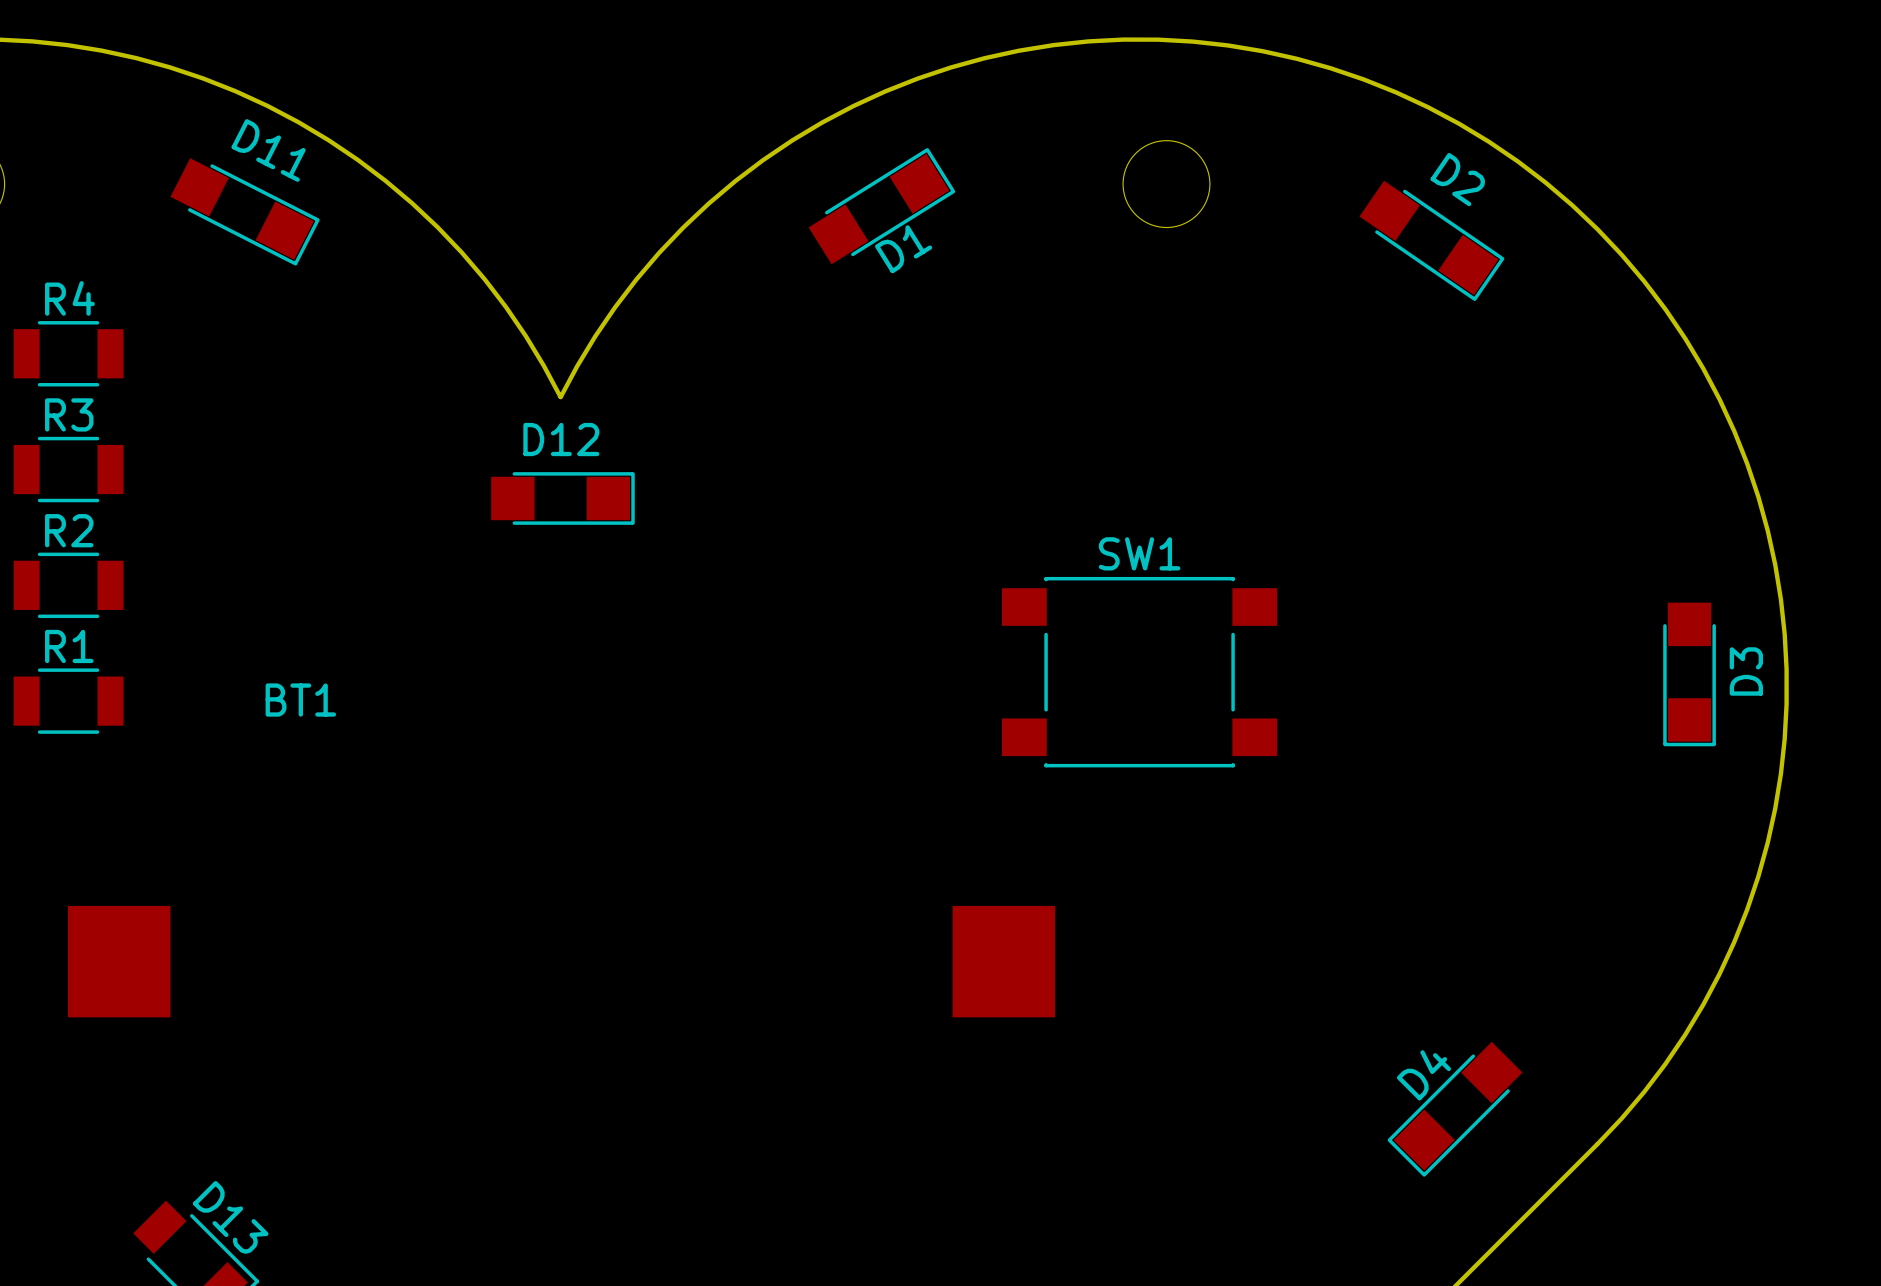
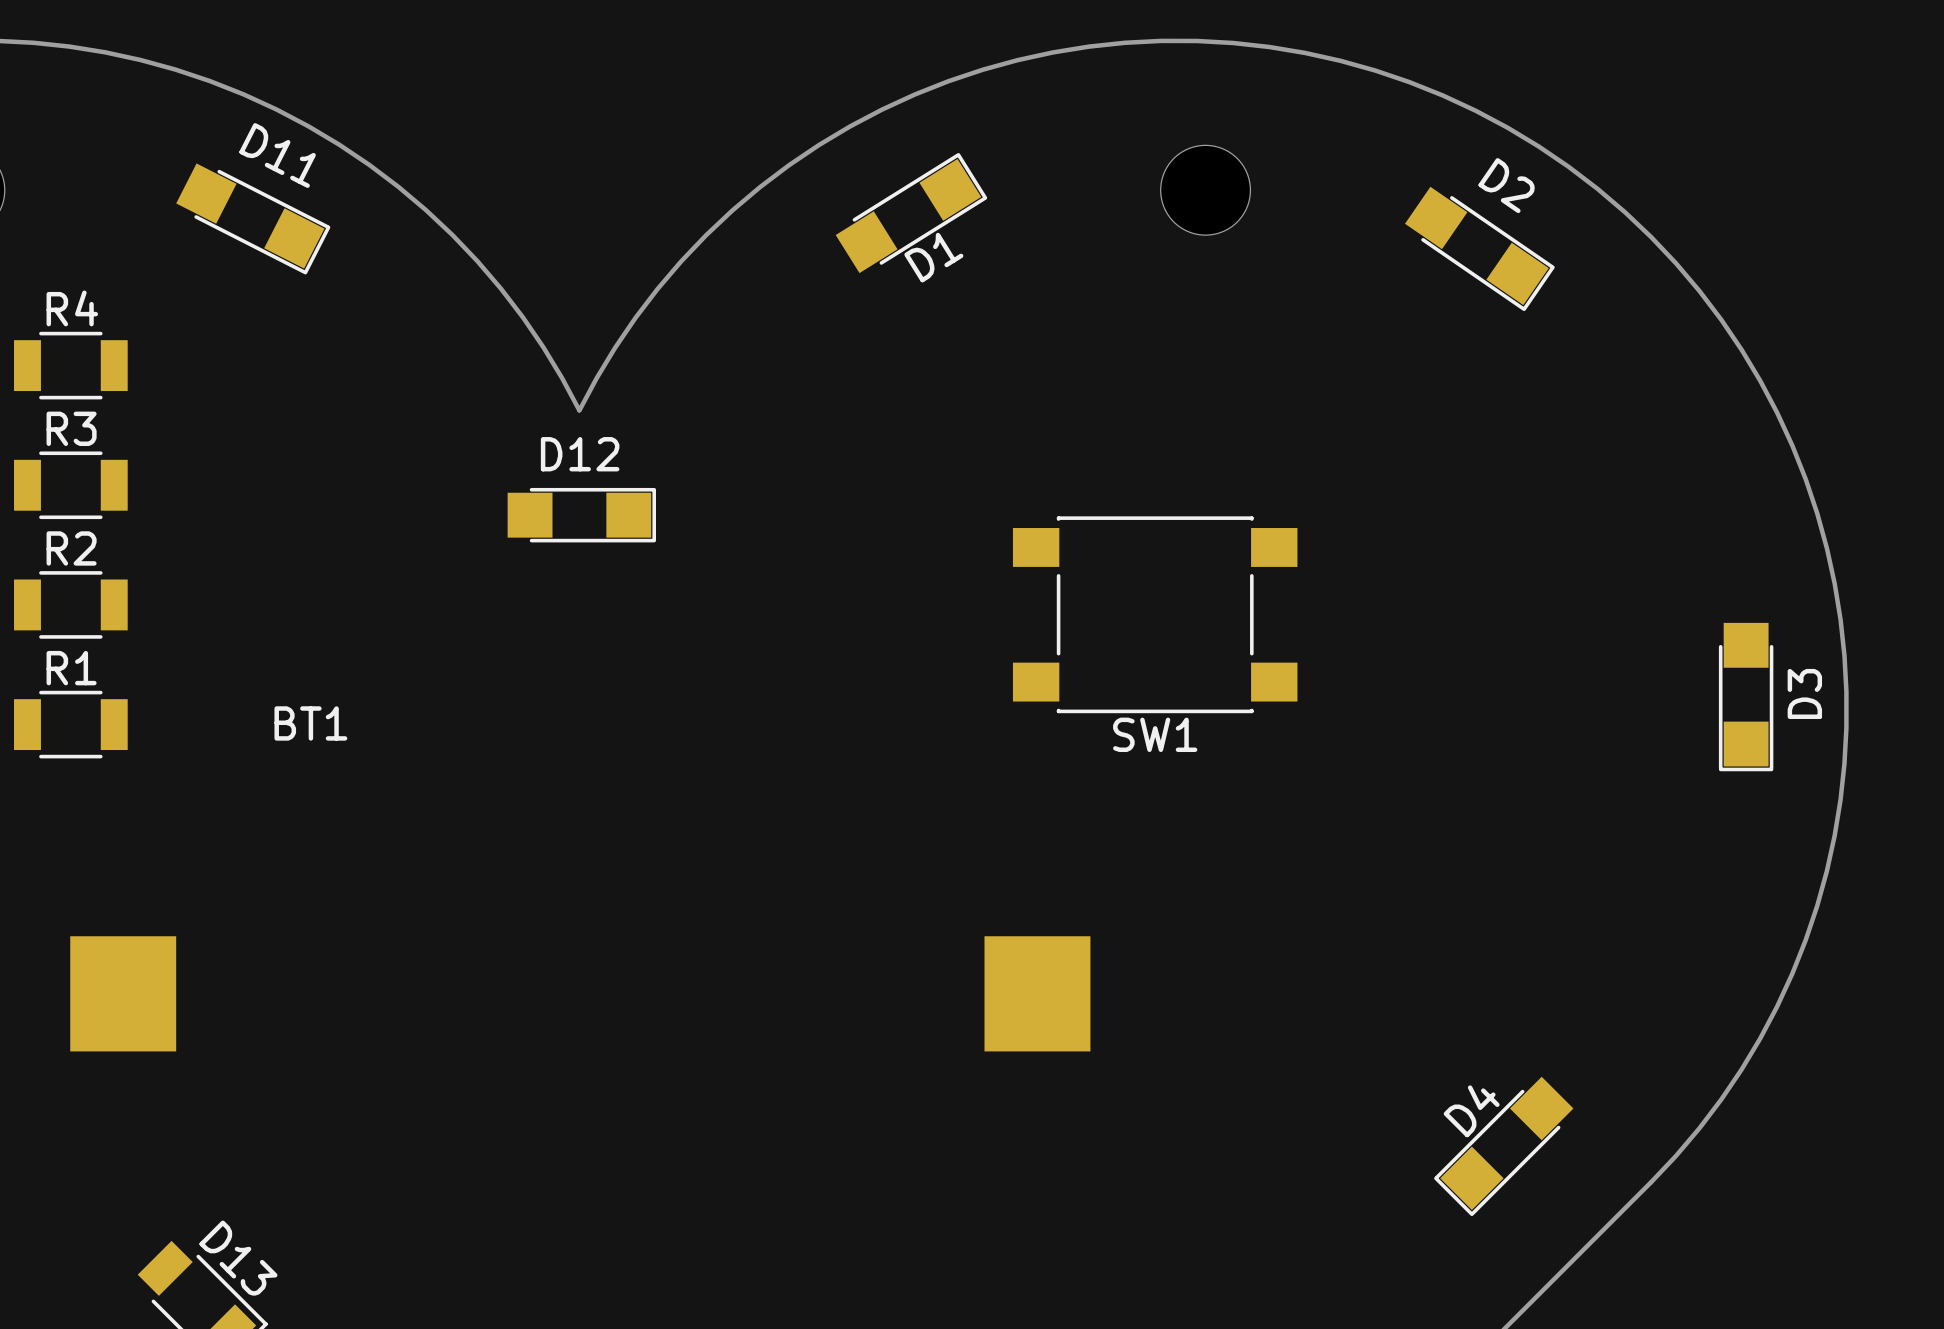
SW1 name position: SW1 (1139, 553) -> SW1 (1155, 734)
SW1 position: (1139, 672) -> (1155, 614)

